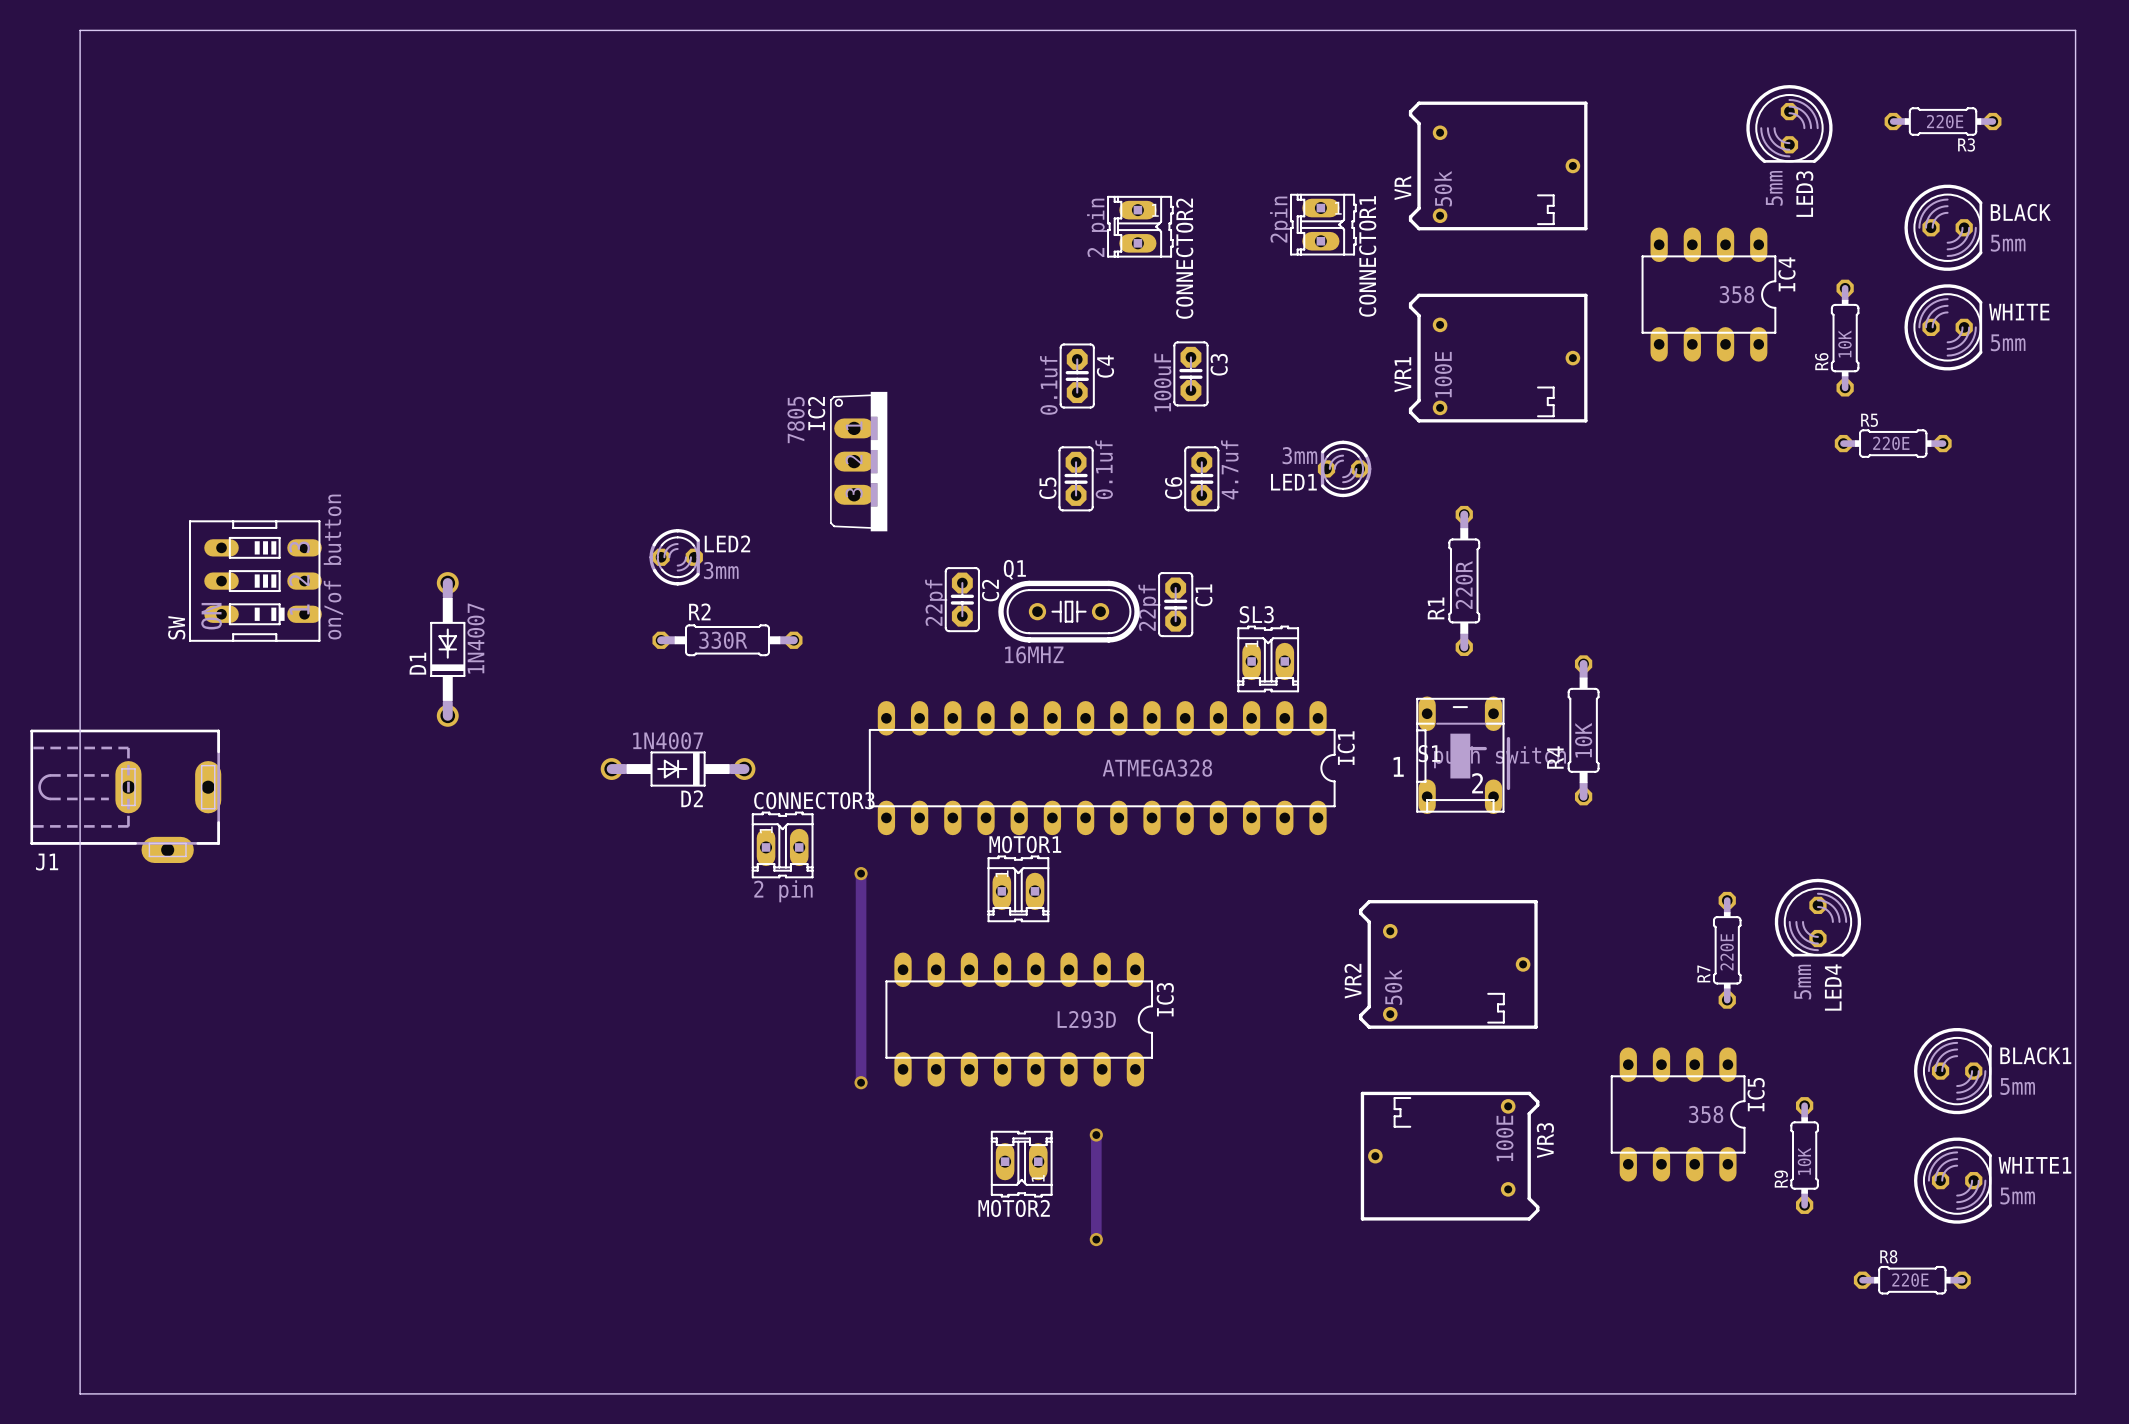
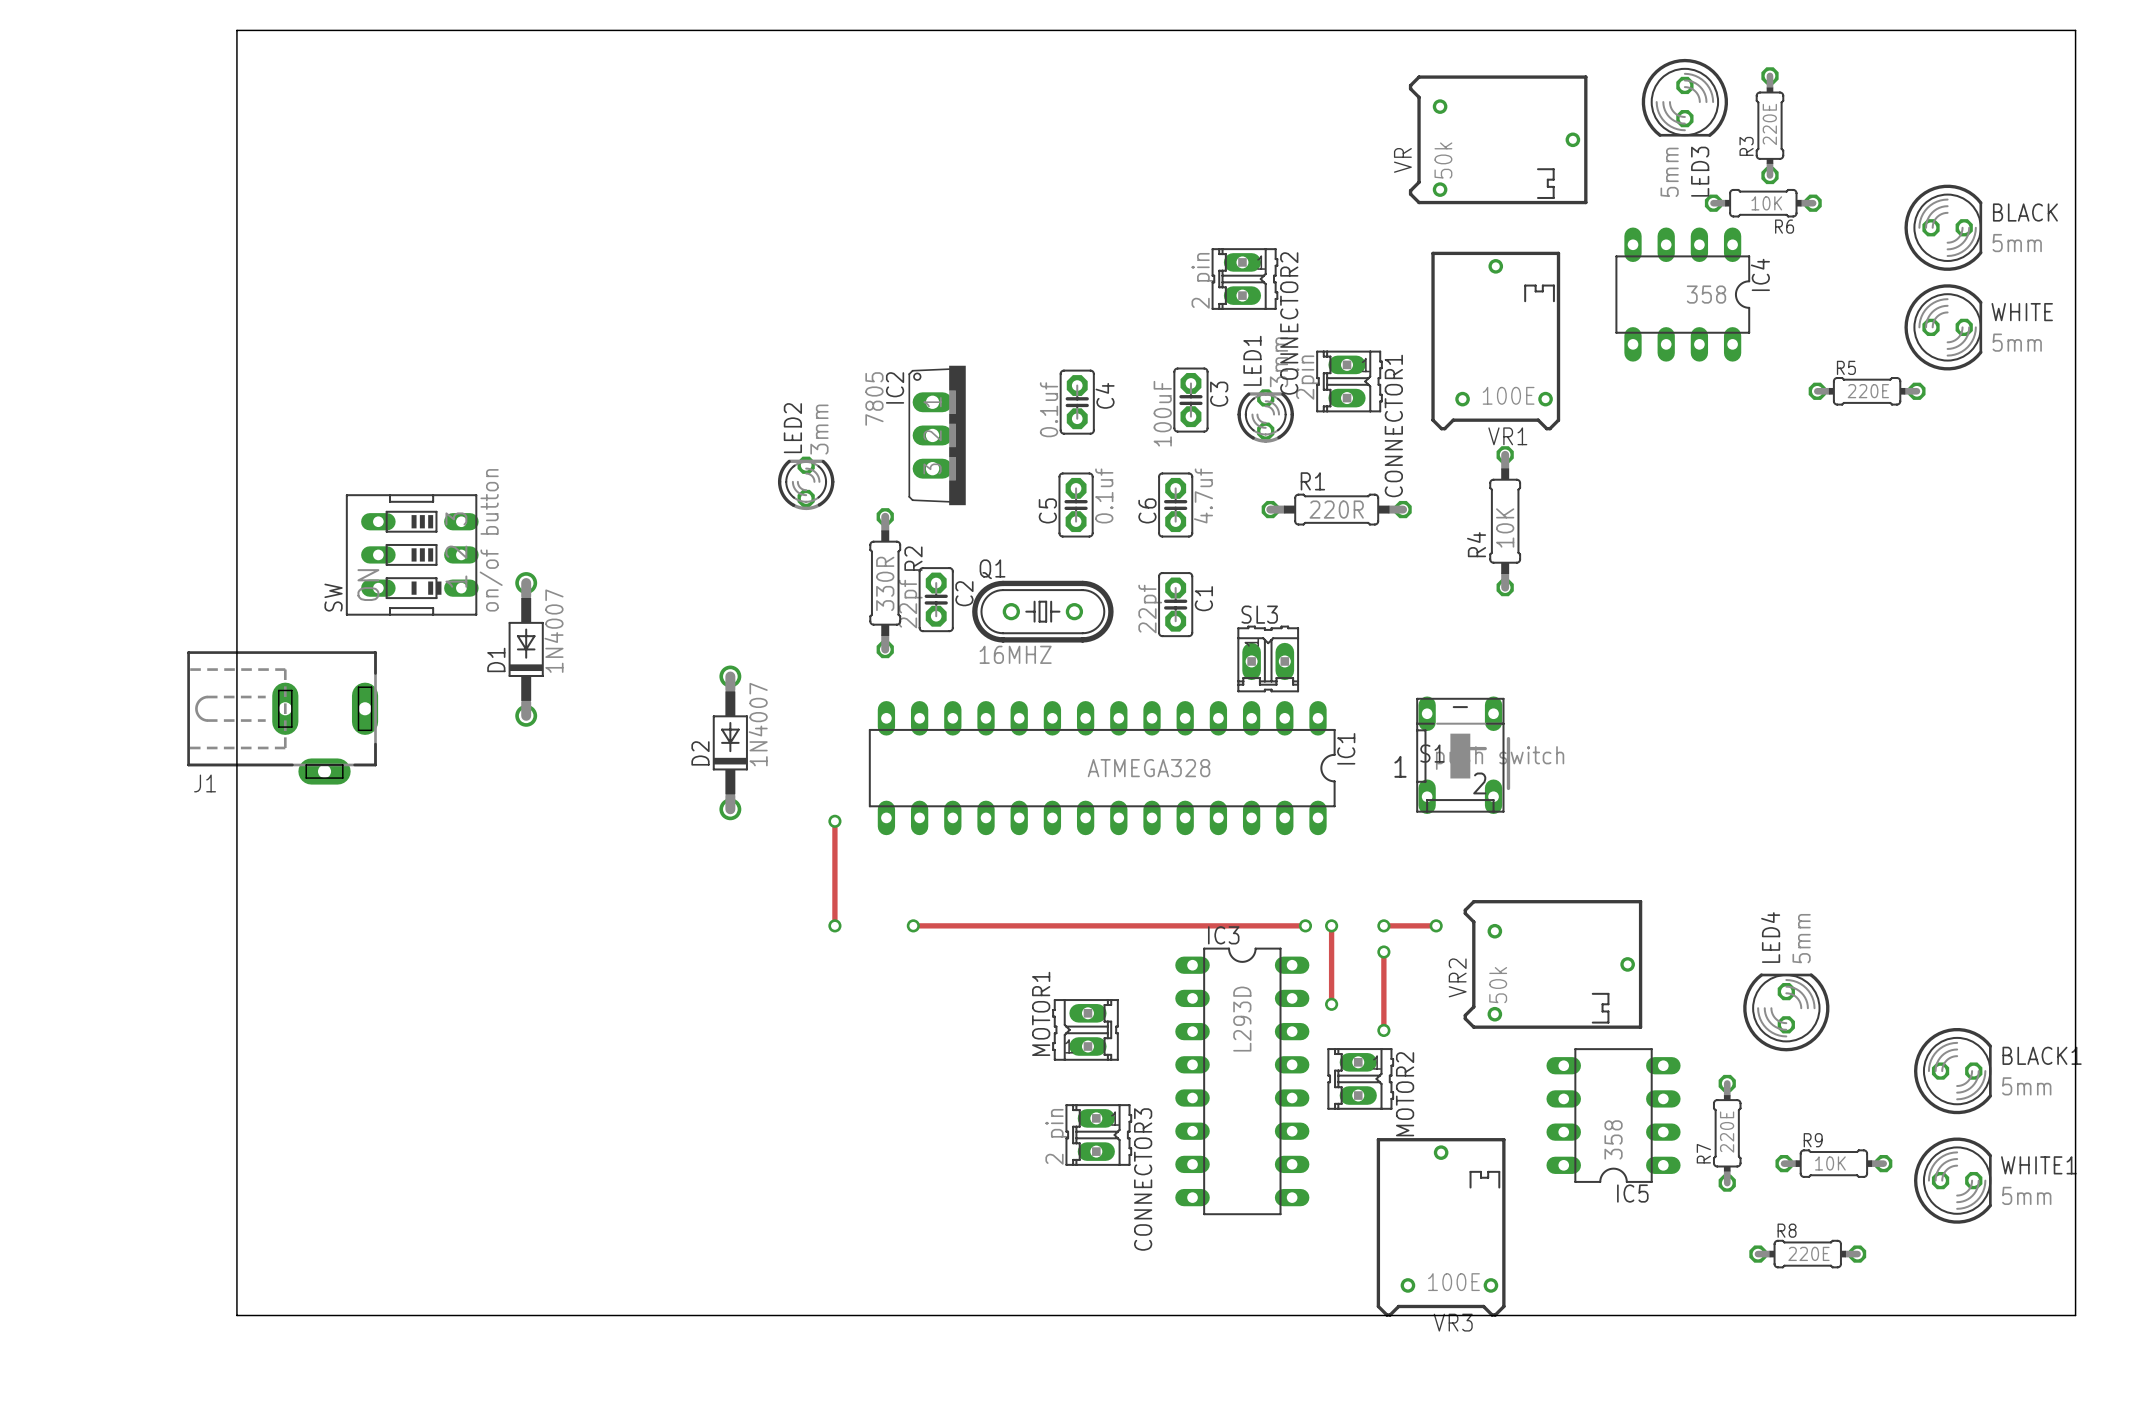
board edge: (236, 30) (80, 30) (80, 1393) (2075, 1393) (2075, 1315) -> (236, 30) (236, 1315) (2075, 1315)
R3 rotation: 0° (1943, 121) -> 90° clockwise (1769, 125)
R3 position: (1943, 121) -> (1769, 125)
LED3 position: (1789, 124) -> (1684, 97)
VR position: (1498, 165) -> (1498, 139)
CONNECTOR1 position: (1323, 224) -> (1349, 381)
CONNECTOR2 position: (1140, 226) -> (1244, 279)
IC4 position: (1708, 294) -> (1682, 294)
R6 rotation: 0° (1845, 338) -> 90° clockwise (1763, 203)
R6 position: (1845, 338) -> (1763, 203)
VR1 rotation: 0° (1498, 358) -> 90° counterclockwise (1495, 341)
R6 name position: R6 (1821, 361) -> R6 (1784, 226)
C3 position: (1190, 373) -> (1190, 400)
C4 position: (1077, 376) -> (1077, 402)
R5 position: (1893, 443) -> (1867, 391)
IC2 position: (858, 461) -> (937, 435)
LED1 rotation: 0° (1344, 468) -> 90° clockwise (1265, 416)
LED1 position: (1344, 468) -> (1265, 416)
C5 position: (1076, 478) -> (1076, 505)
C6 position: (1201, 478) -> (1175, 505)
LED2 rotation: 0° (676, 557) -> 90° counterclockwise (806, 483)
LED2 position: (676, 557) -> (806, 483)
R1 rotation: 0° (1464, 580) -> 90° clockwise (1336, 509)
R1 position: (1464, 580) -> (1336, 509)
SW position: (255, 581) -> (412, 554)
C2 position: (962, 599) -> (936, 599)
Q1 position: (1069, 611) -> (1042, 611)
R2 rotation: 0° (727, 640) -> 90° clockwise (885, 583)
R2 position: (727, 640) -> (885, 583)
D1 position: (447, 649) -> (526, 649)
R4 position: (1583, 730) -> (1505, 521)
D2 rotation: 0° (678, 769) -> 90° clockwise (730, 742)
J1 position: (125, 796) -> (282, 717)
track: none -> (834, 821) (834, 925)
via: none -> (834, 821)
CONNECTOR3 rotation: 0° (782, 844) -> 90° clockwise (1098, 1135)
CONNECTOR3 position: (782, 844) -> (1098, 1135)
MOTOR1 name position: MOTOR1 (1025, 844) -> MOTOR1 (1041, 1013)
MOTOR1 footprint: [987, 855, 1050, 923] -> [1052, 999, 1119, 1061]
track: (861, 873) (861, 1082) -> none
via: (861, 873) -> none
LED4 rotation: 0° (1817, 917) -> 180° (1786, 1012)
LED4 position: (1817, 917) -> (1786, 1012)
via: none -> (834, 925)
track: none -> (913, 925) (1305, 925)
via: none -> (913, 925)
via: none -> (1305, 925)
track: none -> (1331, 925) (1331, 1004)
via: none -> (1331, 925)
track: none -> (1383, 925) (1436, 925)
via: none -> (1383, 925)
via: none -> (1436, 925)
R7 position: (1727, 950) -> (1727, 1133)
track: none -> (1383, 952) (1383, 1030)
via: none -> (1383, 952)
VR2 position: (1448, 964) -> (1552, 964)
via: none -> (1331, 1004)
IC3 rotation: 0° (1019, 1019) -> 90° counterclockwise (1242, 1081)
IC3 position: (1019, 1019) -> (1242, 1081)
via: none -> (1383, 1030)
via: (861, 1082) -> none
IC5 rotation: 0° (1678, 1114) -> 90° clockwise (1613, 1115)
MOTOR2 footprint: [990, 1130, 1053, 1198] -> [1327, 1048, 1395, 1110]
track: (1096, 1135) (1096, 1239) -> none
via: (1096, 1135) -> none
R9 rotation: 0° (1804, 1155) -> 90° clockwise (1833, 1163)
VR3 rotation: 0° (1450, 1156) -> 90° clockwise (1441, 1227)
MOTOR2 name position: MOTOR2 (1014, 1208) -> MOTOR2 (1405, 1094)
via: (1096, 1239) -> none
R8 position: (1912, 1280) -> (1807, 1254)

